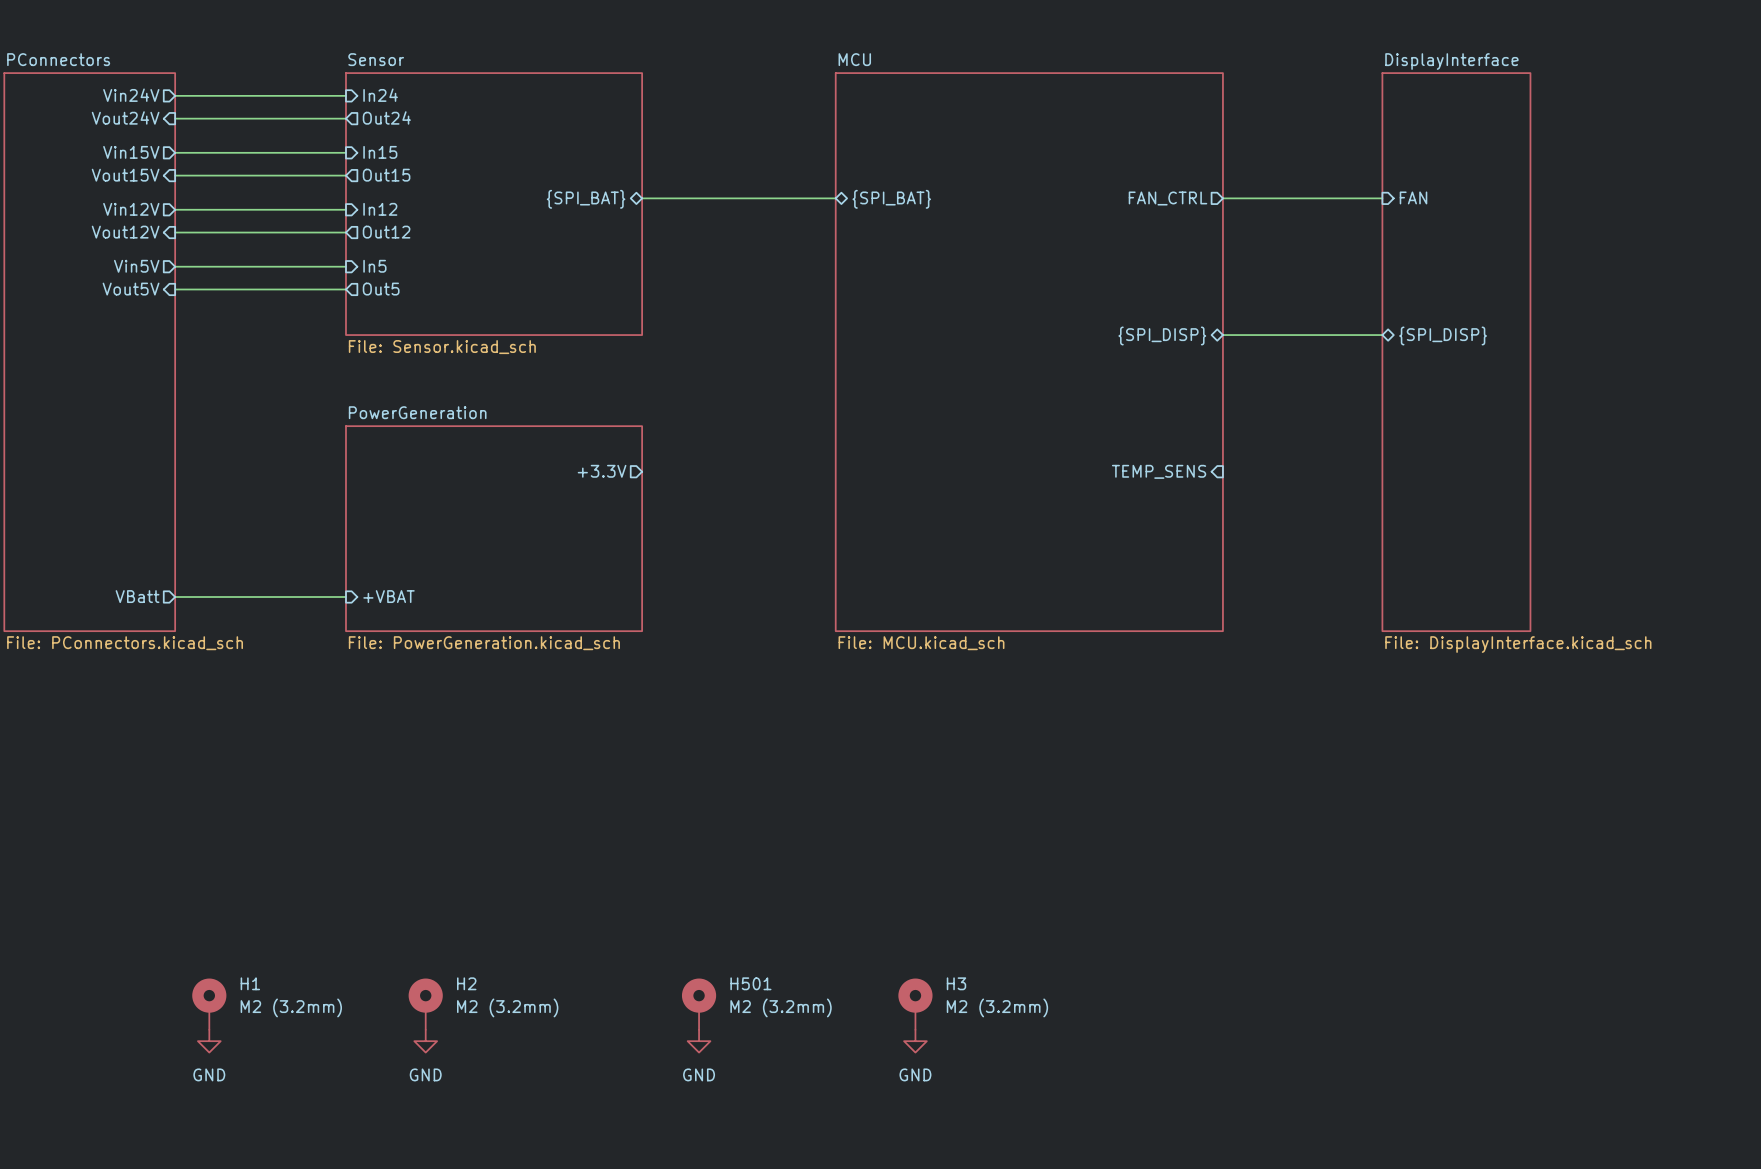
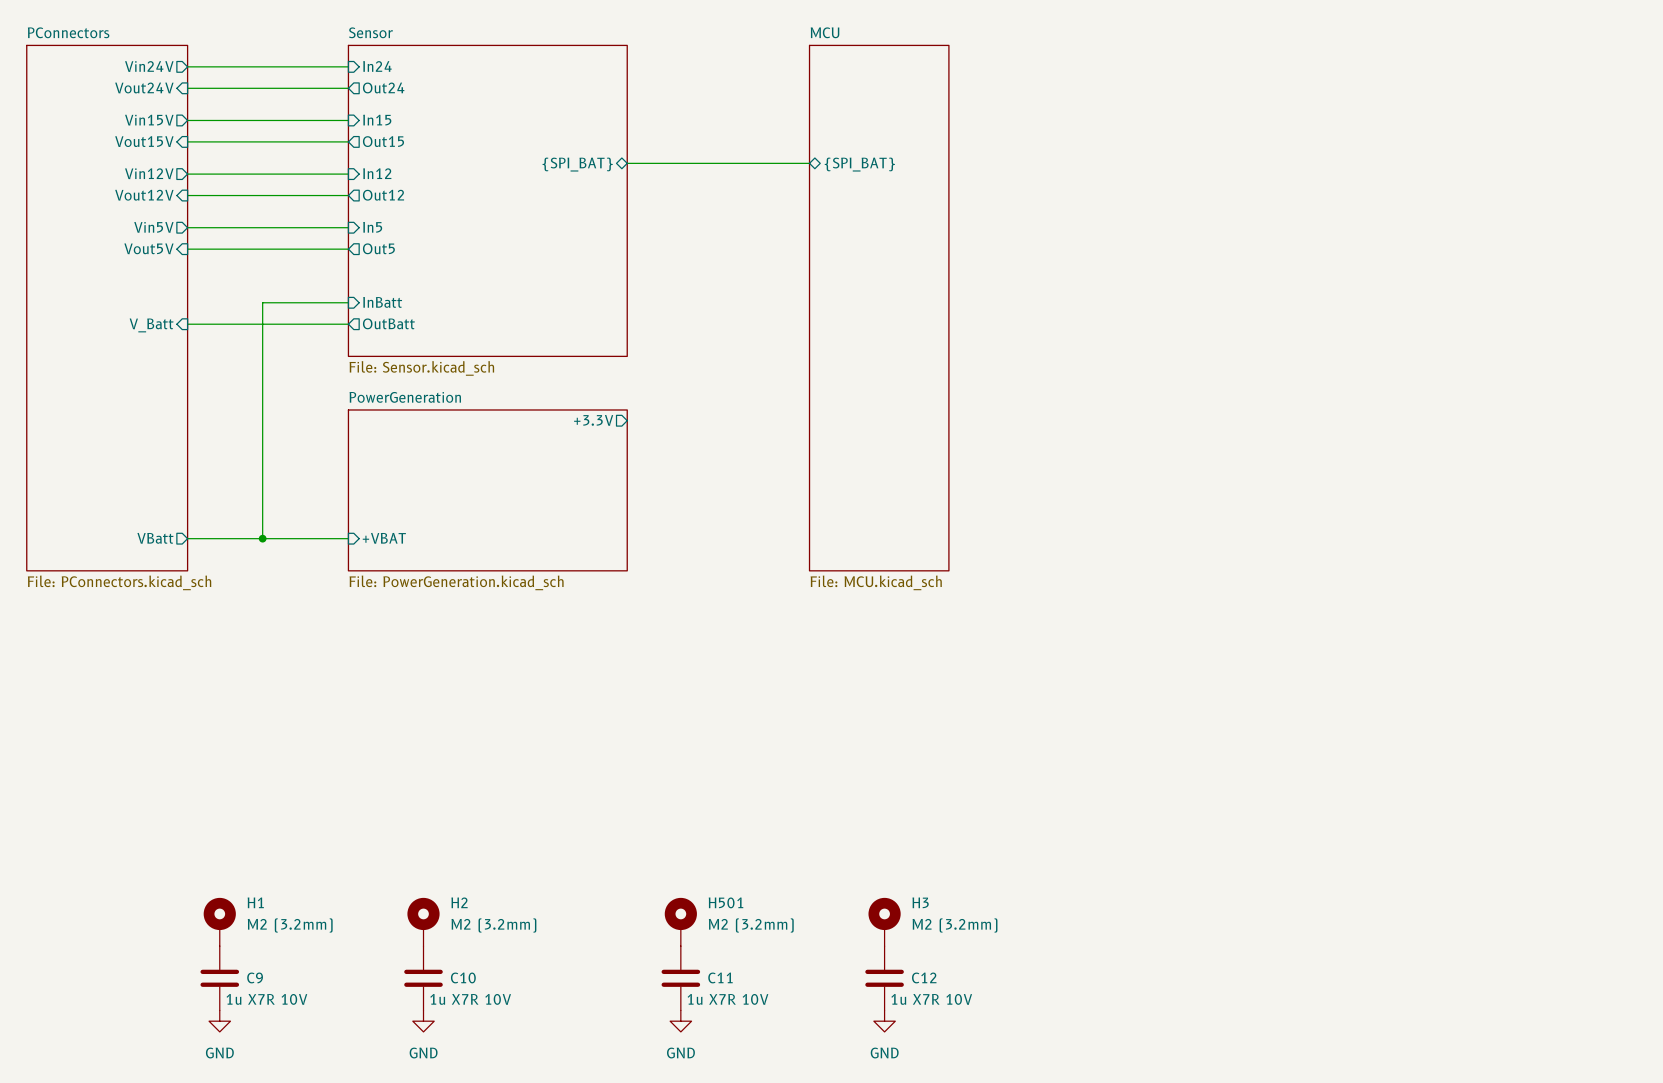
sheet pin: FAN (1413, 197) -> none
sheet pin: FAN_CTRL (1168, 198) -> none
wire: (1222, 198) (1382, 198) -> none
sheet Sensor: File: Sensor.kicad_sch (494, 204) -> none
sheet Sensor: none -> File: Sensor.kicad_sch (487, 200)
sheet pin: {SPI_DISP} (1162, 335) -> none
wire: (1222, 335) (1382, 335) -> none
sheet pin: {SPI_DISP} (1443, 335) -> none
wire: none -> (348, 302) (262, 302) (262, 538)
sheet pin: none -> InBatt (382, 302)
sheet MCU: none -> File: MCU.kicad_sch (879, 308)
sheet MCU: File: MCU.kicad_sch (1029, 352) -> none
sheet DisplayInterface: File: DisplayInterface.kicad_sch (1456, 352) -> none
sheet pin: none -> OutBatt (388, 323)
sheet pin: none -> V_Batt (151, 325)
wire: none -> (187, 324) (348, 324)
sheet pin: TEMP_SENS (1159, 471) -> none
sheet PowerGeneration: File: PowerGeneration.kicad_sch (494, 528) -> none
sheet PowerGeneration: none -> File: PowerGeneration.kicad_sch (487, 490)
junction: none -> (262, 538)
power symbol position: GND (209, 1041) -> GND (219, 1021)
power symbol position: GND (425, 1041) -> GND (423, 1021)
power symbol position: GND (699, 1041) -> GND (680, 1021)
power symbol position: GND (915, 1041) -> GND (884, 1021)
C9: none -> 1u X7R 10V (219, 978)
C10: none -> 1u X7R 10V (423, 978)
C11: none -> 1u X7R 10V (680, 978)
C12: none -> 1u X7R 10V (884, 978)

